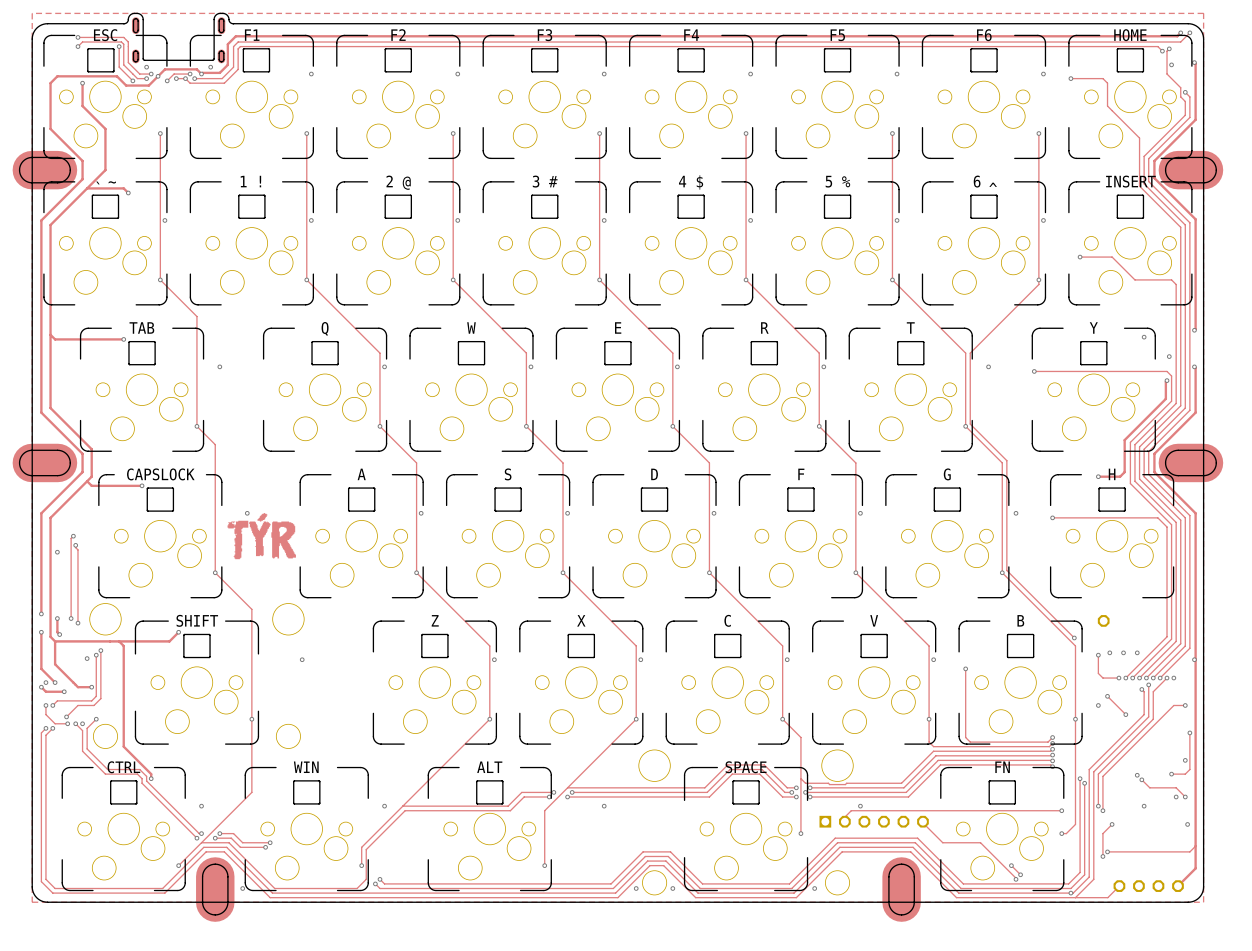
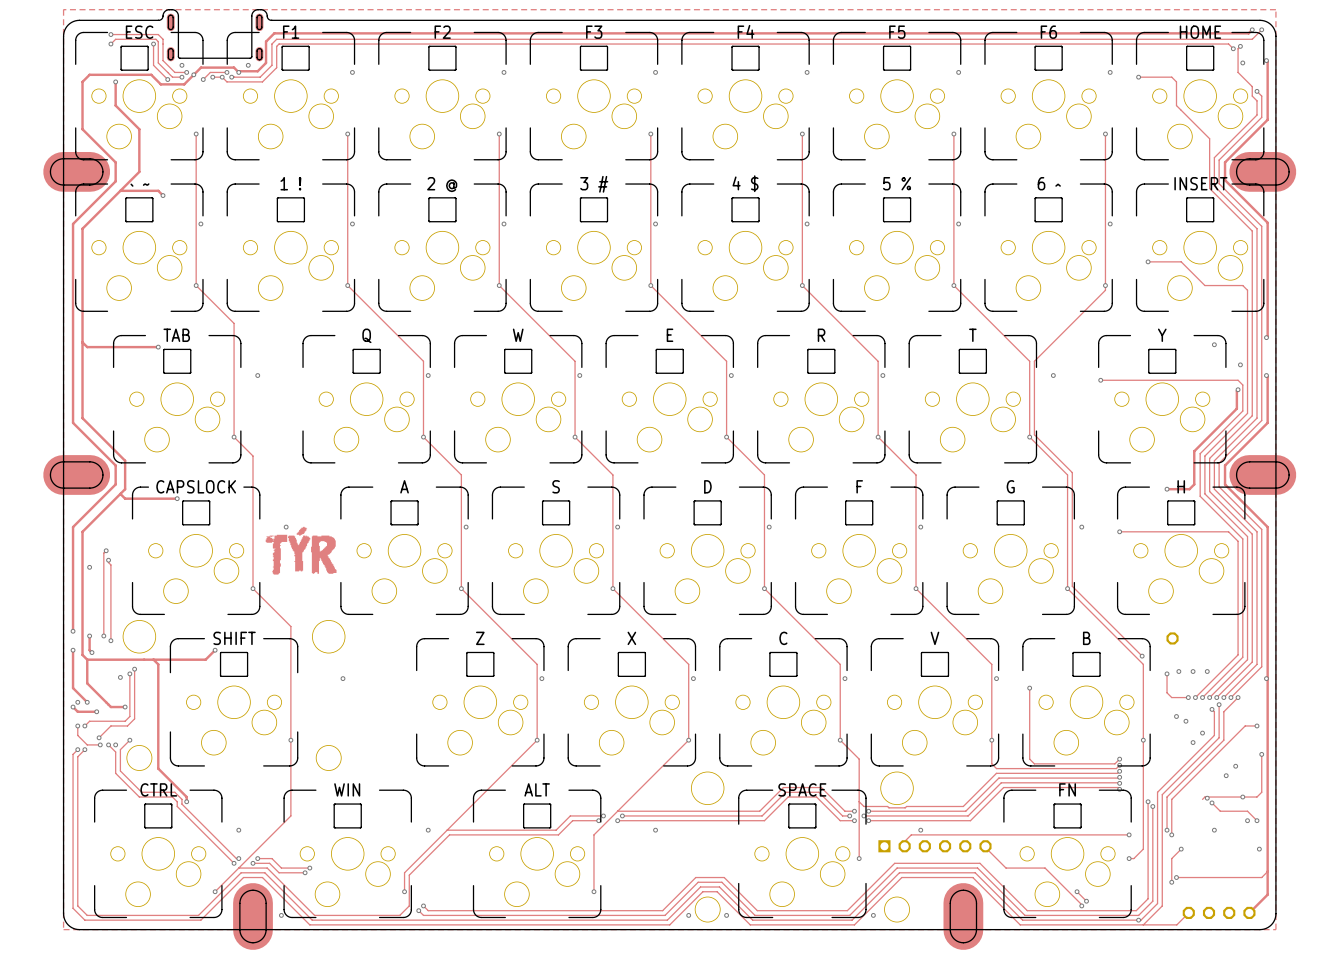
via: (1173, 678) -> none
track: (1107, 696) (1125, 714) -> none
via: none -> (1185, 721)
via: (1098, 705) -> none
via: none -> (1202, 733)
via: (1125, 714) -> none
via: none -> (1193, 742)
via: none -> (1235, 766)
via: none -> (1226, 775)
via: (1185, 760) -> none
track: none -> (1242, 797) (1204, 797) (1202, 799)

